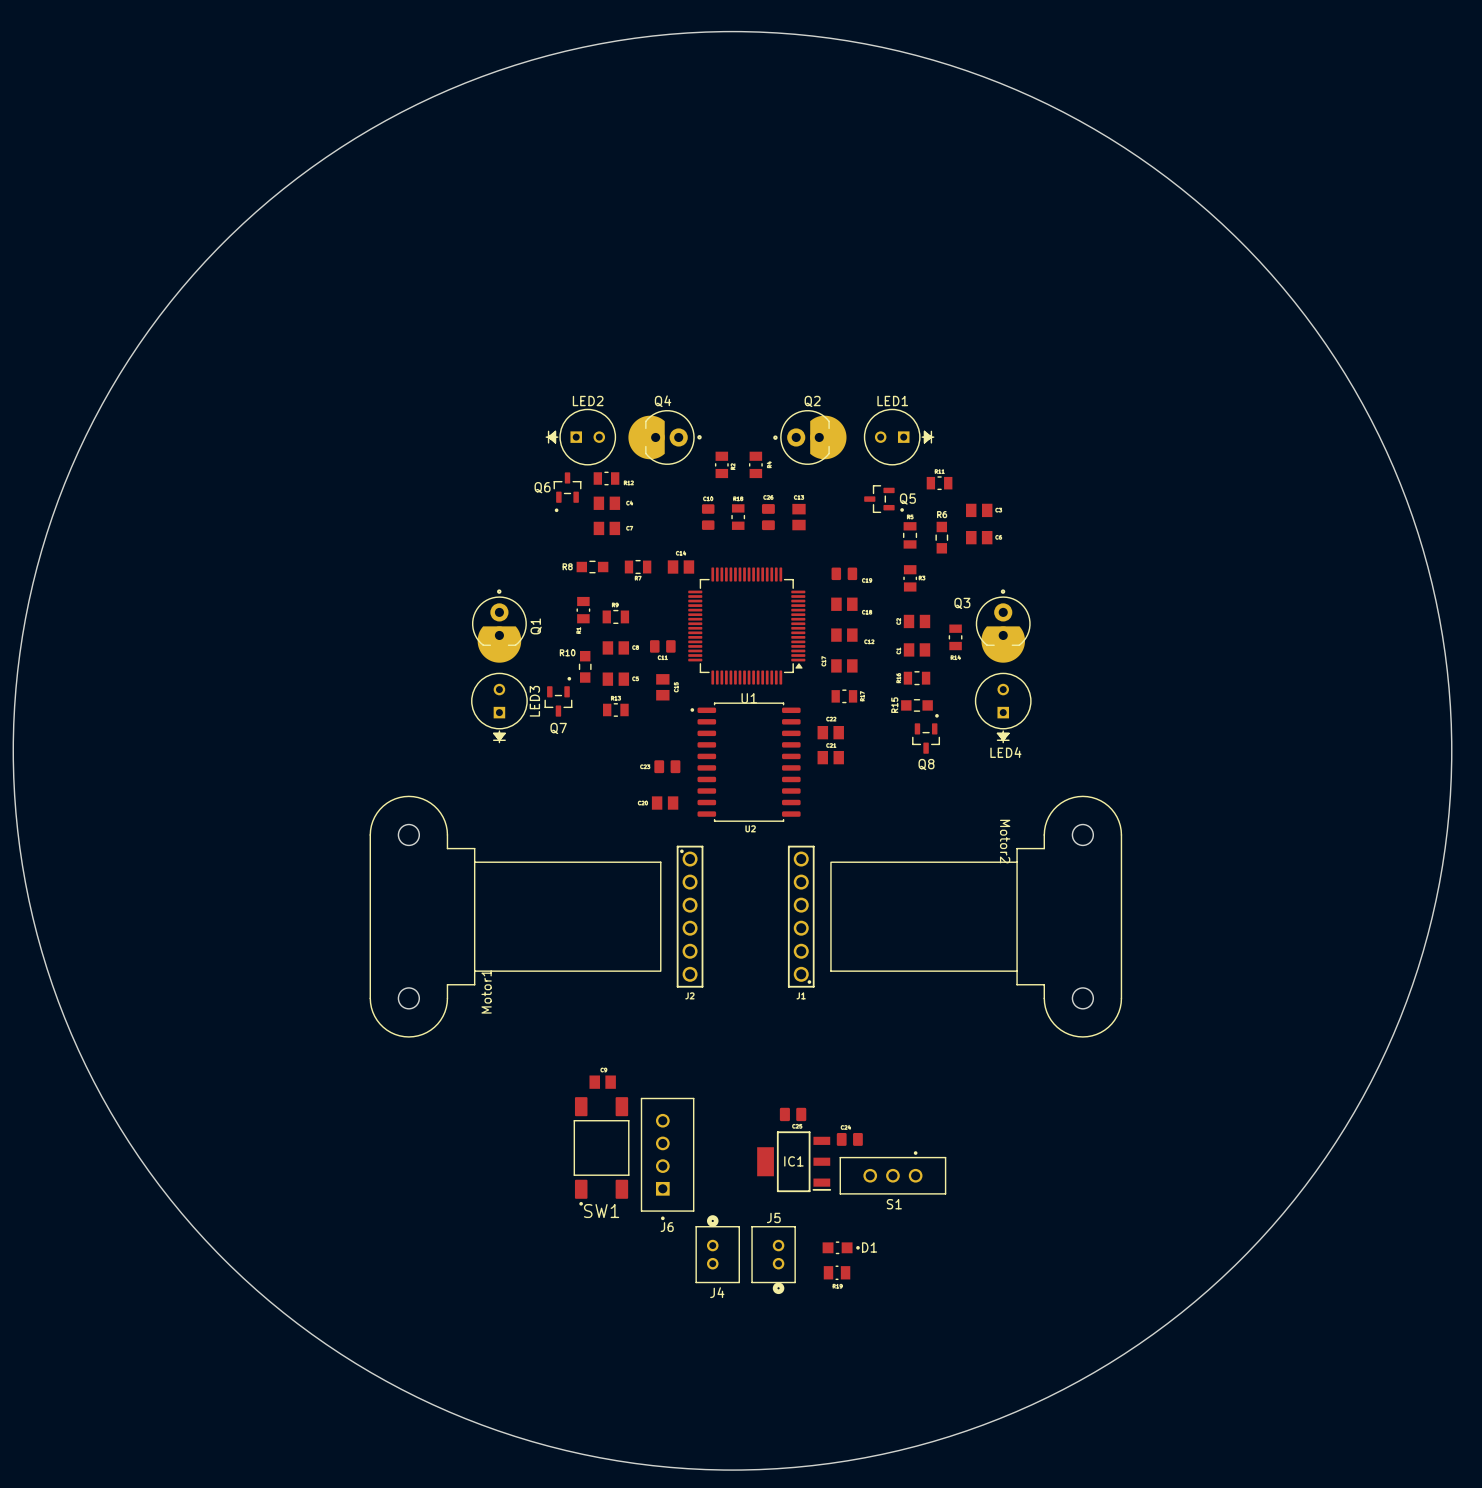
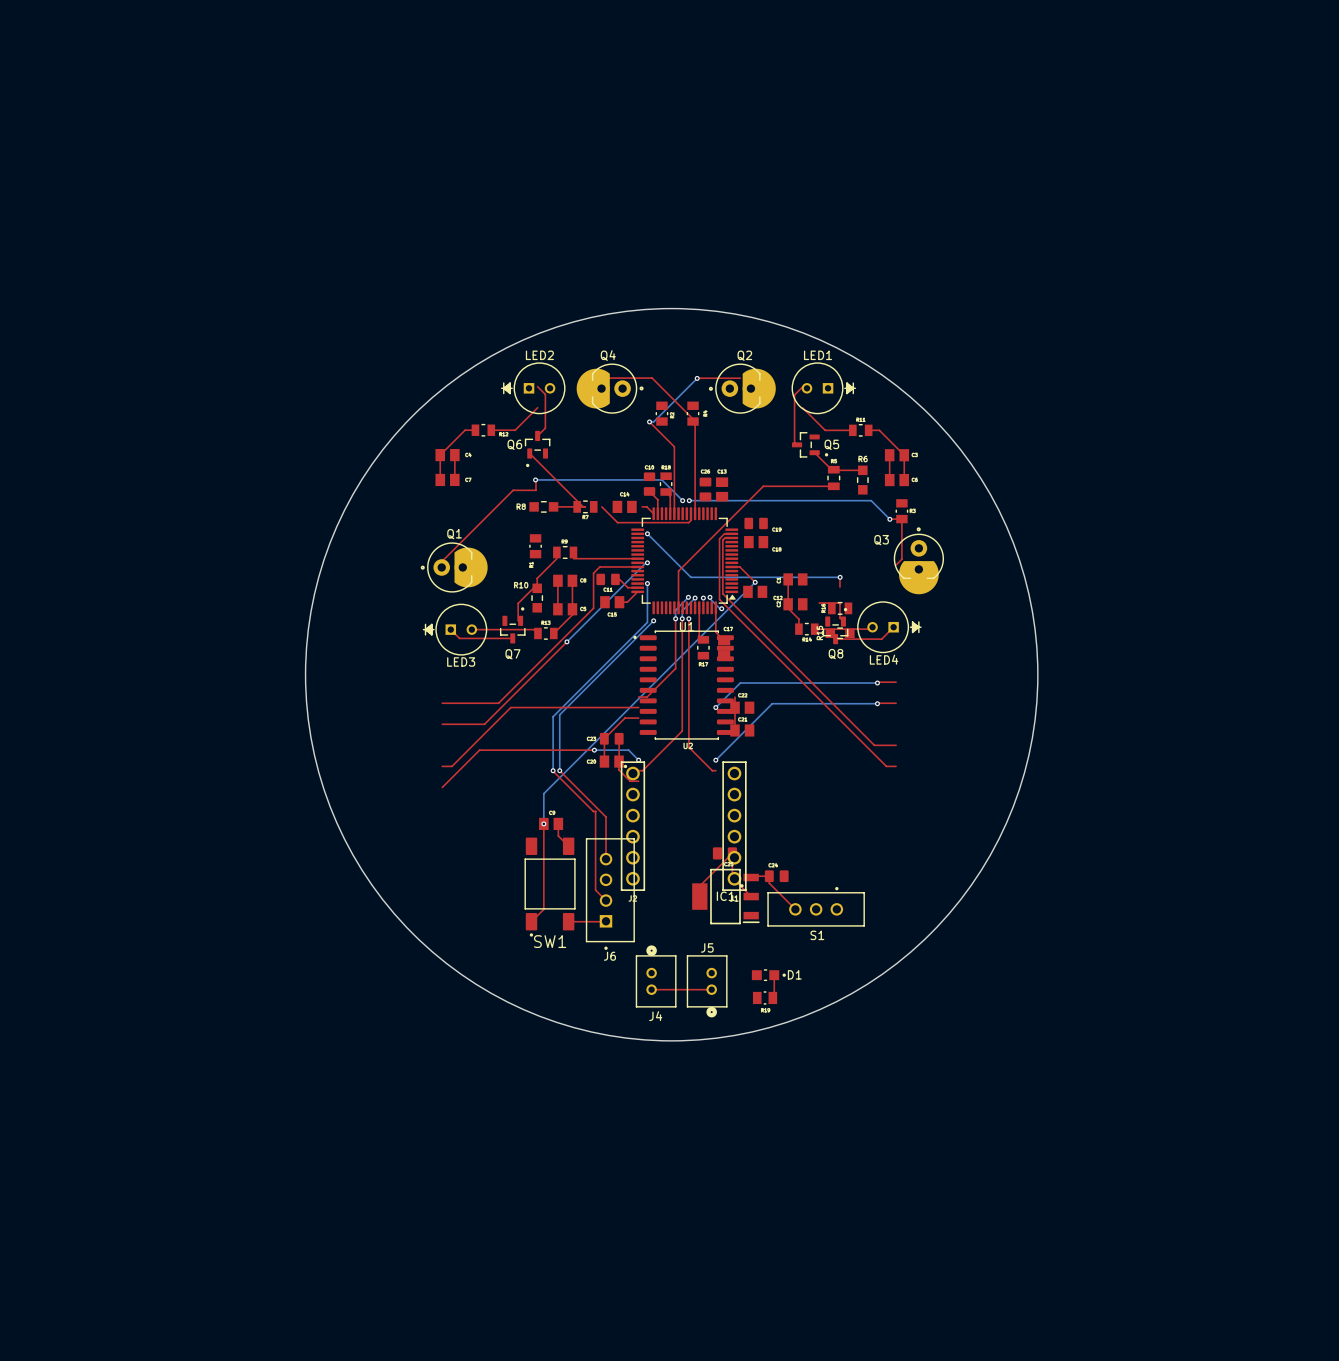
round board edge size: [13, 31, 1452, 1471] -> [305, 308, 1039, 1042]
top track: none -> (599, 378) (652, 378) (695, 421) (695, 513)
bottom track: none -> (697, 378) (653, 421) (649, 421)
via: none -> (697, 378)
top track: none -> (740, 378) (697, 378)
top track: none -> (537, 386) (545, 394) (545, 428) (537, 435)
top track: none -> (802, 386) (794, 395) (794, 442) (797, 444)
top track: none -> (537, 407) (515, 430) (491, 430)
top track: none -> (802, 407) (825, 430) (852, 430)
top track: none -> (649, 421) (674, 446) (674, 513)
via: none -> (649, 421)
part position: (606, 478) -> (483, 430)
top track: none -> (475, 430) (465, 430) (440, 455) (440, 479)
top track: none -> (868, 430) (879, 430) (904, 455) (904, 480)
Q6 position: (567, 492) -> (537, 448)
part position: (606, 503) -> (447, 455)
top track: none -> (814, 452) (831, 469) (862, 470)
top track: none -> (529, 453) (583, 506)
top track: none -> (454, 455) (454, 479)
top track: none -> (889, 455) (889, 480)
part position: (708, 517) -> (649, 484)
part position: (738, 517) -> (666, 484)
part position: (768, 517) -> (705, 489)
part position: (798, 517) -> (722, 489)
part position: (606, 528) -> (447, 479)
top track: none -> (535, 479) (535, 490) (513, 490) (441, 561) (441, 567)
bottom track: none -> (535, 479) (661, 479) (682, 500)
via: none -> (535, 479)
top track: none -> (833, 486) (763, 486) (678, 571) (678, 607)
top track: none -> (649, 491) (657, 499) (657, 513)
top track: none -> (666, 492) (670, 496) (670, 513)
via: none -> (682, 500)
bottom track: none -> (689, 500) (871, 500) (889, 519)
via: none -> (689, 500)
top track: none -> (553, 506) (585, 506)
top track: none -> (601, 506) (617, 522) (688, 522) (690, 520) (690, 513)
top track: none -> (642, 506) (646, 506) (653, 513)
part position: (844, 573) -> (756, 523)
part position: (910, 578) -> (901, 511)
top track: none -> (889, 519) (901, 519) (901, 559) (896, 564)
via: none -> (889, 519)
bottom track: none -> (647, 533) (690, 577) (840, 577)
via: none -> (647, 533)
top track: none -> (731, 533) (724, 533) (719, 538) (719, 599) (886, 766) (896, 766)
top track: none -> (731, 537) (725, 537) (722, 540) (722, 593) (874, 745) (896, 745)
part position: (844, 604) -> (756, 542)
part position: (916, 621) -> (795, 604)
top track: none -> (556, 558) (537, 578) (537, 584) (518, 603) (518, 620)
top track: none -> (573, 558) (637, 558)
Q1 rotation: 0° (499, 626) -> 90° counterclockwise (454, 567)
bottom track: none -> (647, 562) (566, 641)
via: none -> (647, 562)
top track: none -> (637, 566) (599, 566) (593, 573) (593, 608) (498, 703) (442, 703)
top track: none -> (731, 566) (739, 566) (755, 582)
part position: (844, 635) -> (755, 591)
part rotation: 0° (955, 637) -> 90° clockwise (806, 629)
part position: (955, 637) -> (806, 629)
top track: none -> (840, 577) (839, 587)
via: none -> (840, 577)
top track: none -> (619, 579) (627, 587) (637, 587)
top track: none -> (788, 579) (788, 600)
top track: none -> (557, 581) (557, 606)
top track: none -> (572, 581) (572, 606)
bottom track: none -> (755, 582) (543, 793) (543, 823)
via: none -> (755, 582)
part position: (916, 649) -> (795, 579)
bottom track: none -> (647, 583) (647, 622) (553, 716) (553, 770)
via: none -> (647, 583)
top track: none -> (637, 591) (627, 602) (619, 602)
part rotation: 0° (844, 665) -> 90° clockwise (724, 647)
part position: (844, 665) -> (724, 647)
bottom track: none -> (688, 597) (675, 610) (675, 618)
via: none -> (688, 597)
bottom track: none -> (695, 598) (682, 610) (682, 618)
via: none -> (695, 598)
via: none -> (703, 598)
bottom track: none -> (709, 597) (721, 608)
via: none -> (709, 597)
top track: none -> (788, 600) (788, 608) (798, 619) (798, 629)
top track: none -> (819, 603) (839, 603) (839, 618) (843, 621)
top track: none -> (572, 606) (572, 614) (553, 633)
top track: none -> (699, 607) (699, 635) (703, 639)
top track: none -> (715, 607) (715, 632) (724, 640)
via: none -> (721, 608)
part rotation: 0° (662, 687) -> 90° clockwise (612, 602)
part position: (662, 687) -> (612, 602)
top track: none -> (675, 618) (675, 668) (647, 697) (638, 697)
via: none -> (675, 618)
top track: none -> (682, 618) (682, 731) (642, 770) (638, 770)
via: none -> (682, 618)
top track: none -> (688, 618) (688, 747) (712, 770) (715, 770)
via: none -> (688, 618)
bottom track: none -> (653, 620) (559, 714) (559, 770)
via: none -> (653, 620)
part rotation: 0° (844, 696) -> 90° clockwise (703, 647)
part position: (844, 696) -> (703, 647)
top track: none -> (872, 627) (870, 629) (814, 629)
top track: none -> (893, 627) (881, 639) (835, 639)
top track: none -> (450, 629) (459, 638) (510, 638)
top track: none -> (471, 629) (534, 629) (537, 633)
LED3 rotation: 0° (499, 708) -> 90° clockwise (454, 629)
LED4 rotation: 0° (1003, 708) -> 90° counterclockwise (889, 627)
part position: (615, 709) -> (545, 633)
top track: none -> (566, 641) (484, 724) (442, 724)
via: none -> (566, 641)
part position: (830, 732) -> (742, 707)
Q8 position: (926, 733) -> (835, 626)
part position: (830, 757) -> (742, 730)
bottom track: none -> (877, 683) (740, 683) (715, 707)
via: none -> (877, 683)
top track: none -> (896, 682) (877, 683)
part position: (667, 766) -> (611, 738)
top track: none -> (735, 697) (734, 730)
bottom track: none -> (877, 703) (772, 703) (715, 760)
via: none -> (877, 703)
top track: none -> (896, 703) (877, 703)
top track: none -> (638, 707) (510, 707) (451, 766) (442, 766)
via: none -> (715, 707)
top track: none -> (638, 718) (625, 718) (604, 738) (604, 761)
part position: (665, 803) -> (611, 761)
top track: none -> (619, 738) (619, 770) (630, 781) (638, 781)
top track: none -> (594, 750) (479, 750) (442, 787)
bottom track: none -> (594, 750) (628, 750) (638, 760)
via: none -> (594, 750)
via: none -> (638, 760)
via: none -> (715, 760)
top track: none -> (553, 770) (593, 811) (595, 811)
via: none -> (553, 770)
top track: none -> (559, 770) (606, 817) (606, 859)
via: none -> (559, 770)
top track: none -> (595, 811) (595, 890) (606, 900)
top track: none -> (543, 823) (543, 909) (531, 921)
via: none -> (543, 823)
top track: none -> (558, 823) (558, 836) (568, 846)
Motor1: (515, 916) -> none
Motor2: (976, 916) -> none
top track: none -> (751, 877) (769, 876) (769, 883) (795, 909)
top track: none -> (699, 896) (699, 886) (732, 853) (732, 877) (751, 896)
top track: none -> (606, 921) (568, 921)
top track: none -> (774, 975) (772, 997)
part position: (602, 1082) -> (551, 823)
top track: none -> (651, 989) (711, 989)
part position: (793, 1114) -> (724, 853)
part position: (849, 1139) -> (776, 876)
SW1 position: (601, 1151) -> (550, 887)
J6 position: (667, 1159) -> (610, 894)
IC1 position: (794, 1161) -> (725, 896)
S1 position: (892, 1172) -> (816, 906)
D1 position: (841, 1247) -> (768, 975)
J4 position: (717, 1249) -> (656, 976)
J5 position: (773, 1260) -> (707, 986)
part position: (837, 1272) -> (765, 997)

